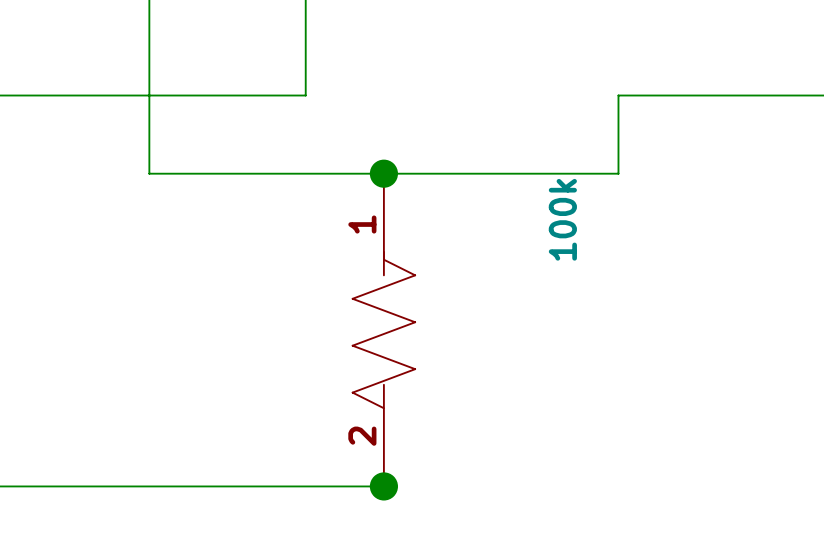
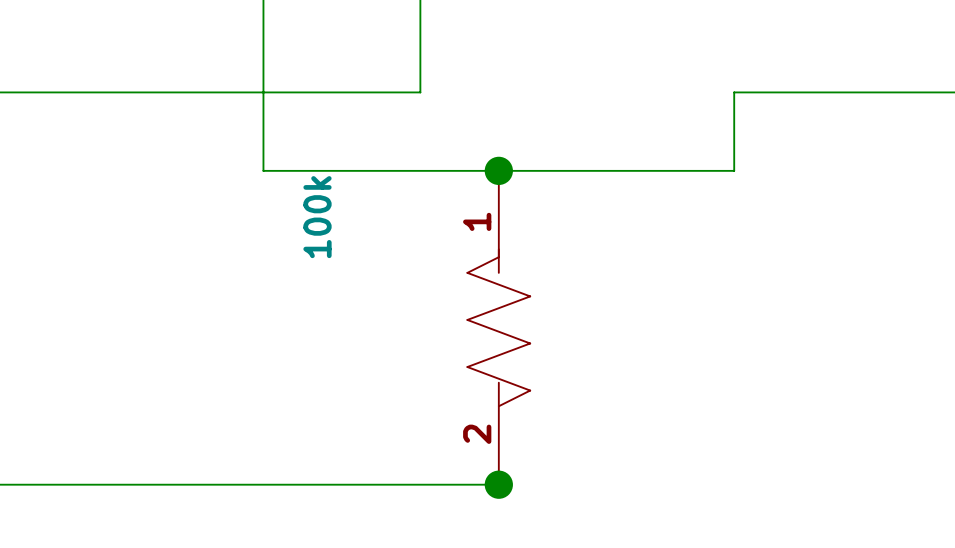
part flip: as is (383, 330) -> left-right (498, 327)

